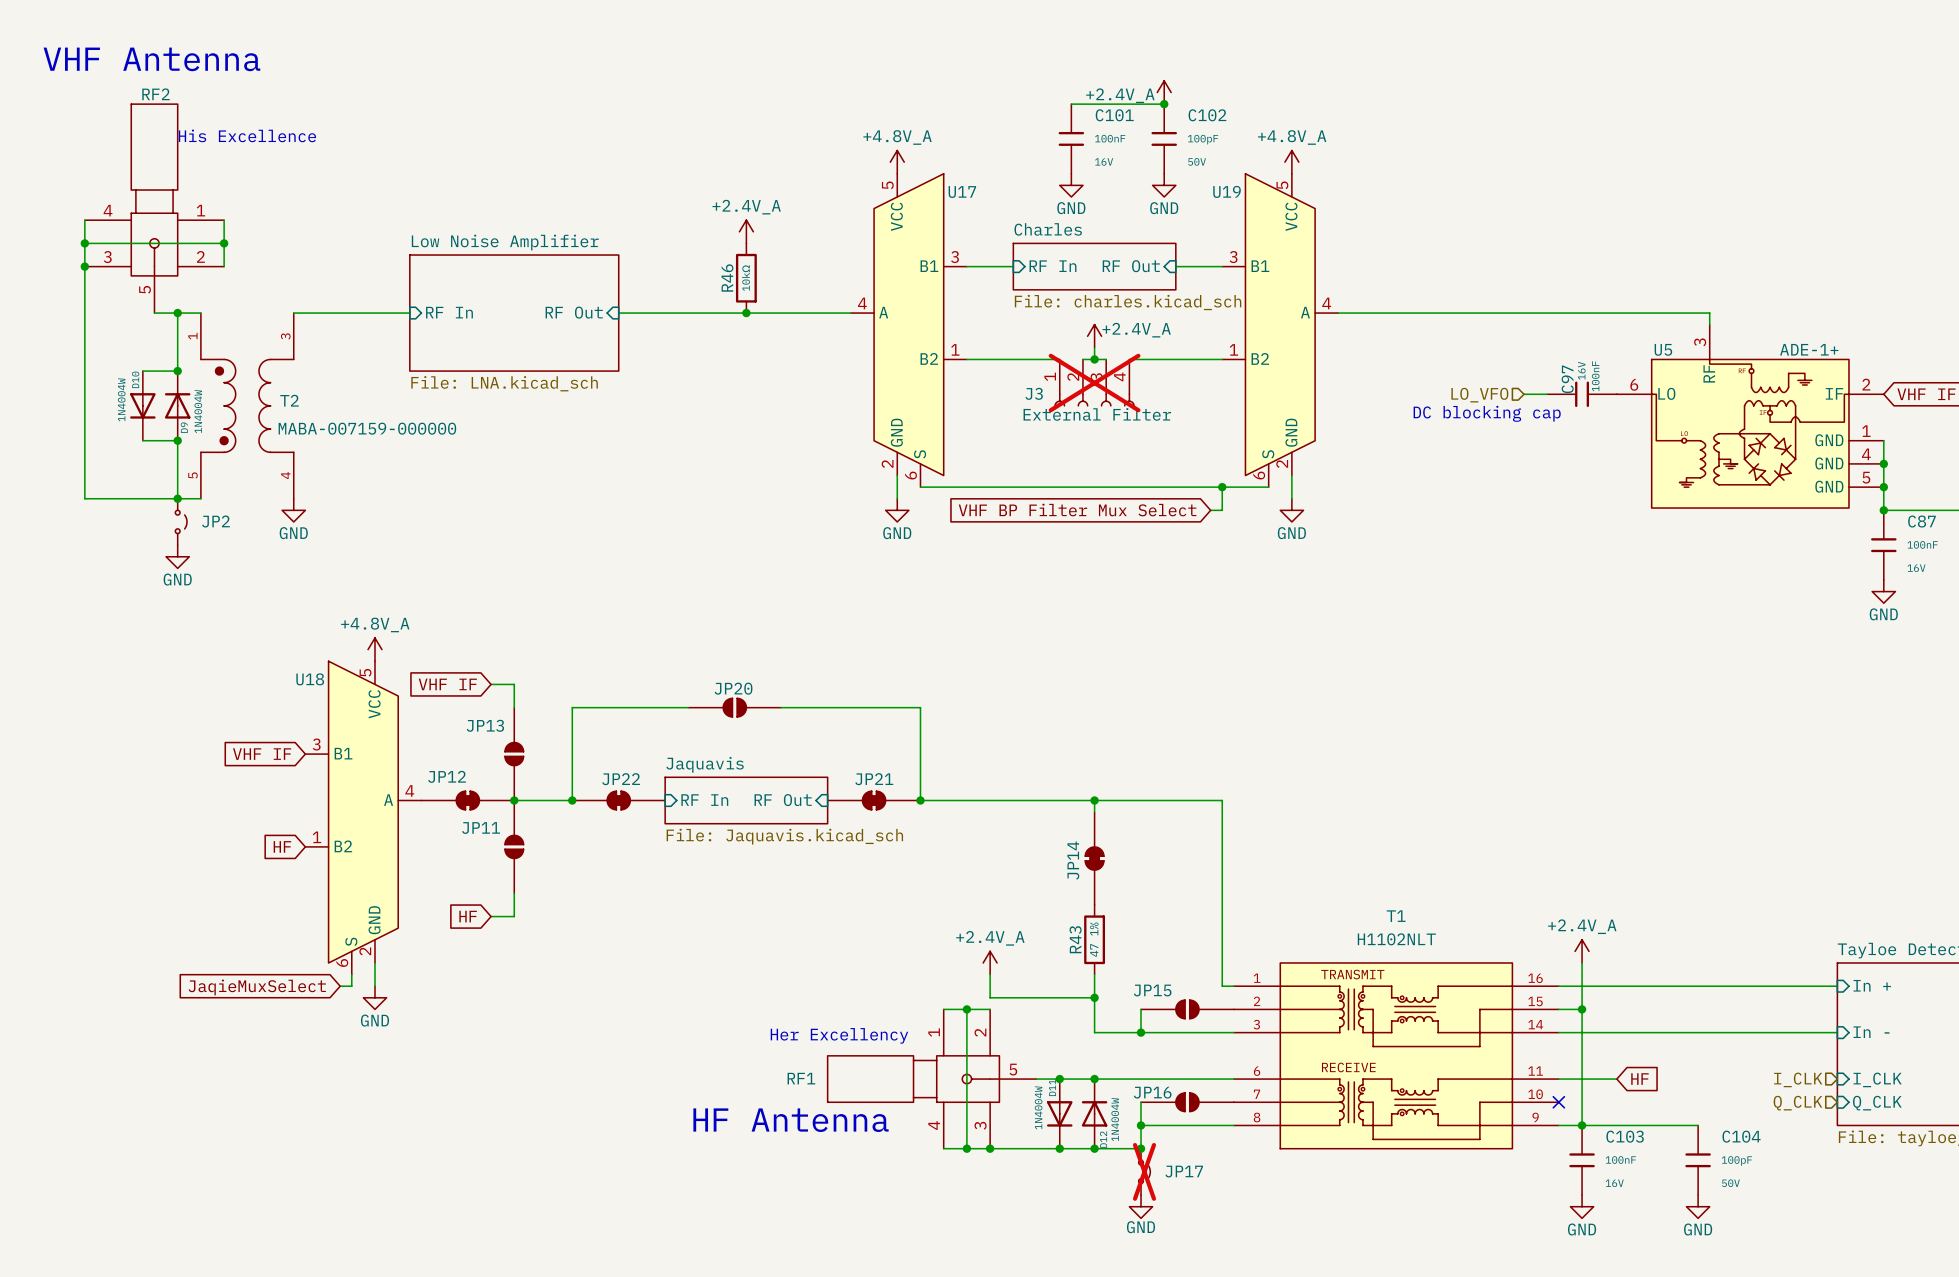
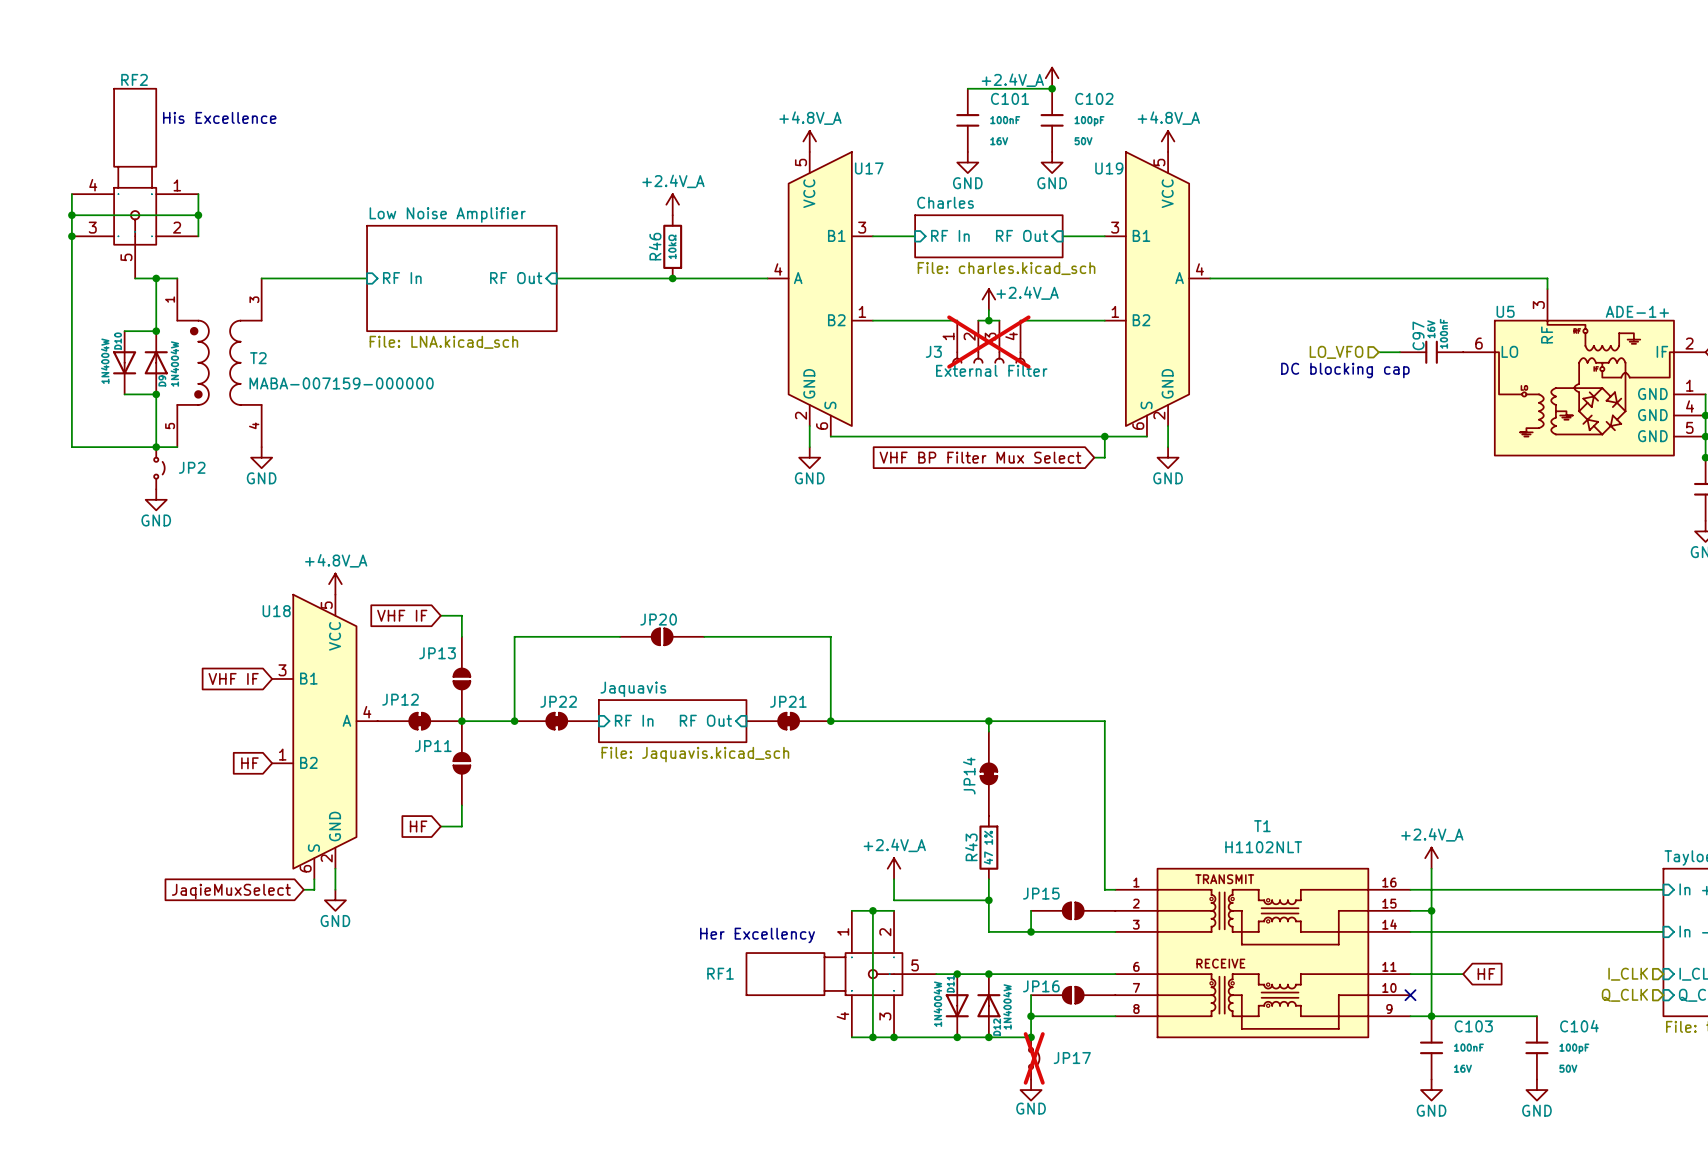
text: VHF Antenna (151, 59) -> none
text: HF Antenna (790, 1120) -> none

